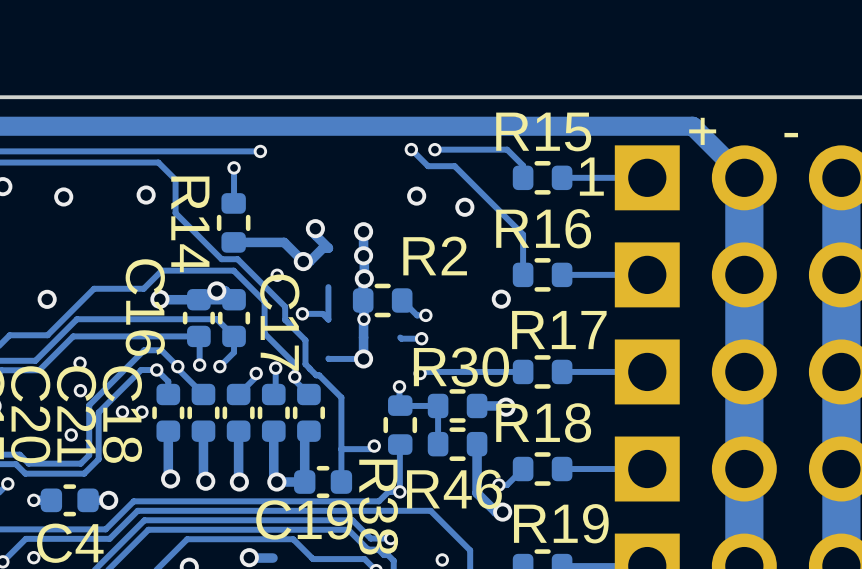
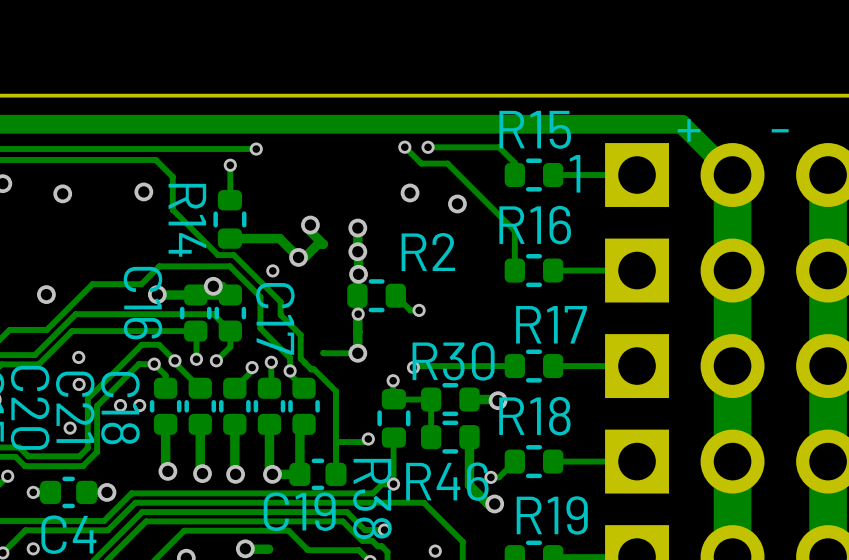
track: (328, 287) (328, 319) (322, 313) (302, 313) -> none
via: (501, 299) -> none
via: (302, 313) -> none
track: (400, 337) (421, 338) -> none
via: (421, 338) -> none

